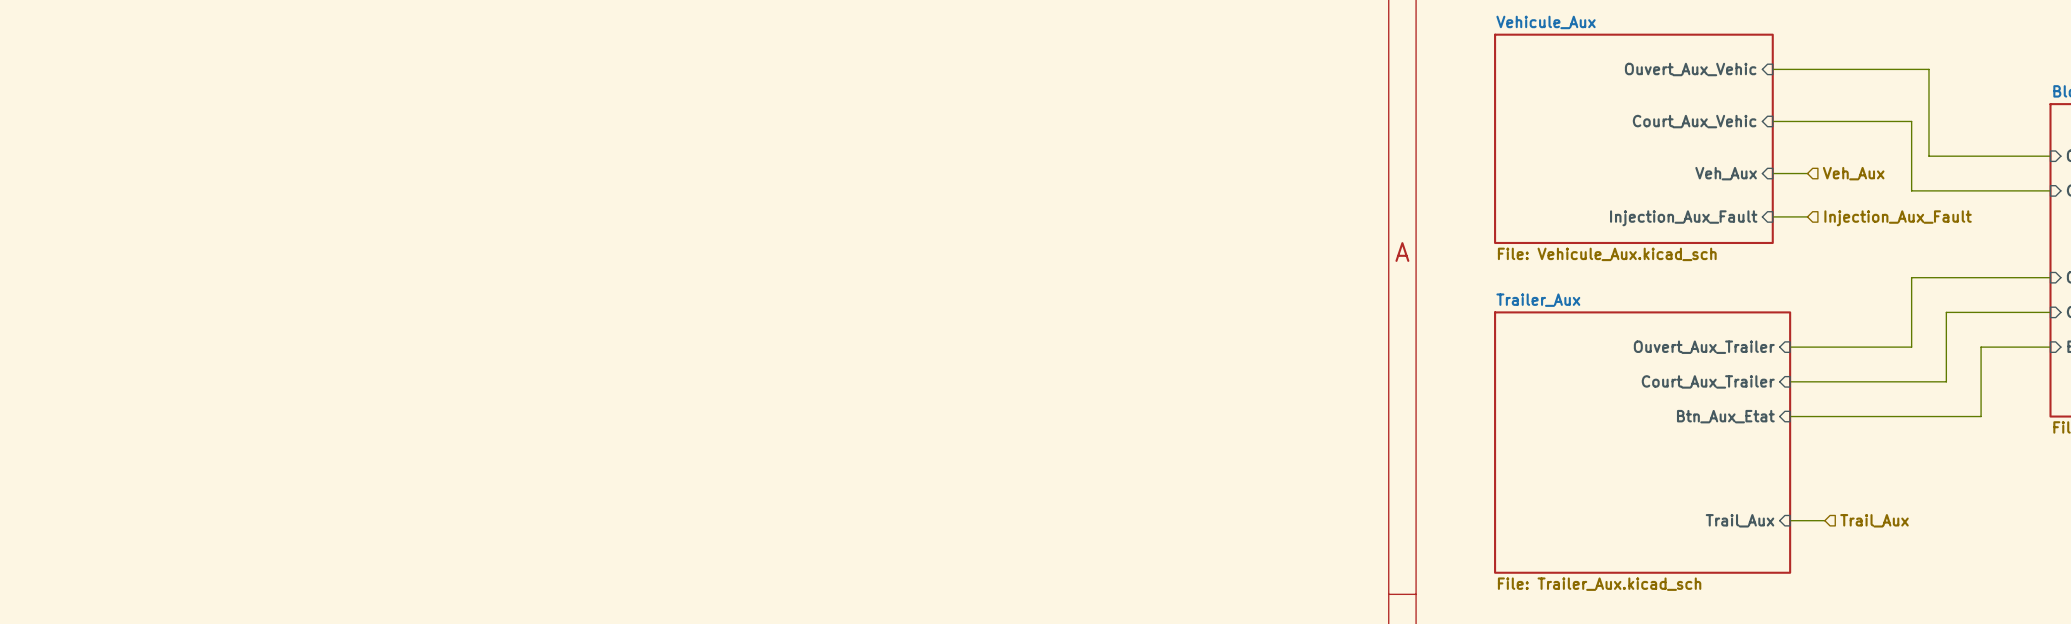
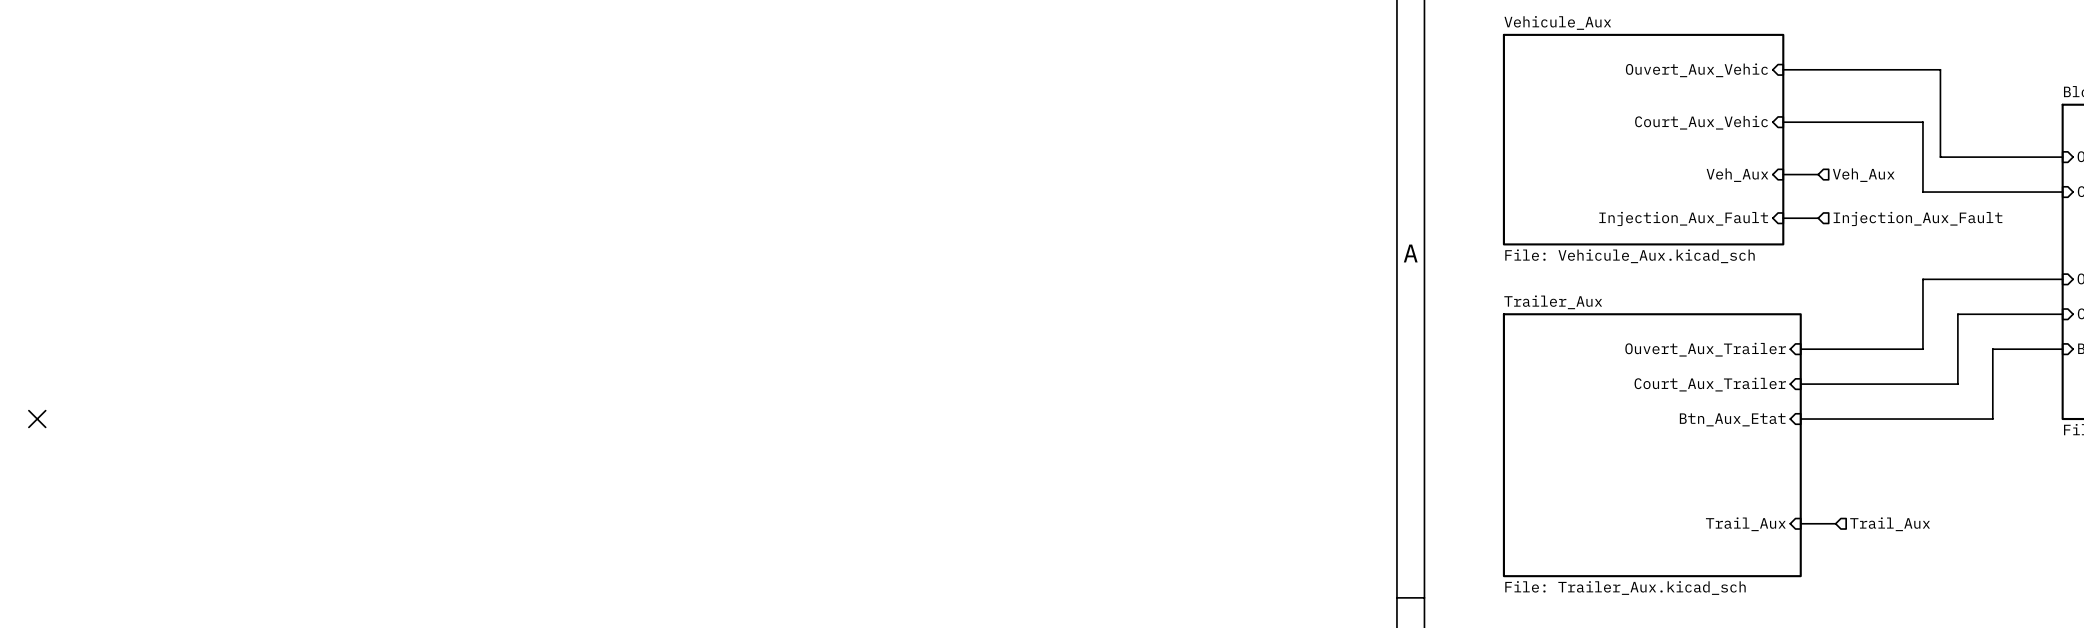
no-connect mark: none -> (37, 419)

